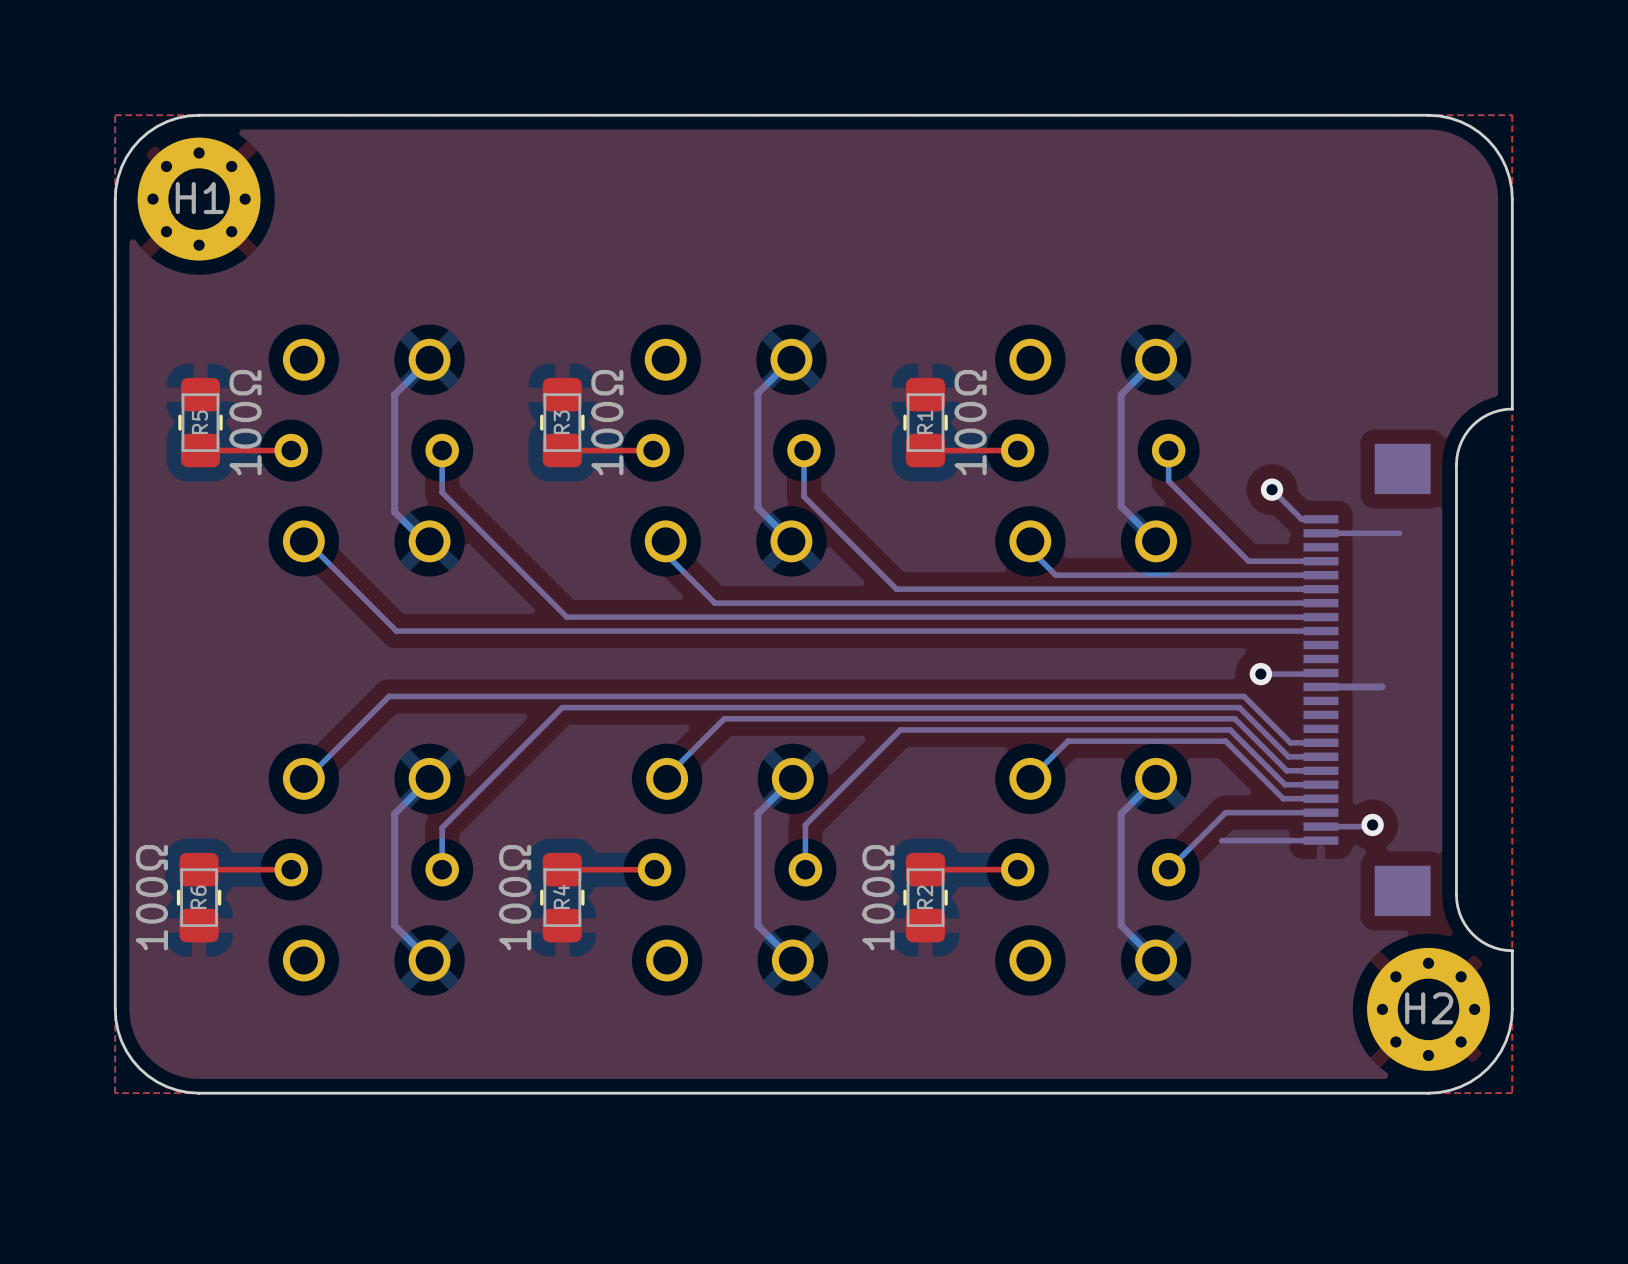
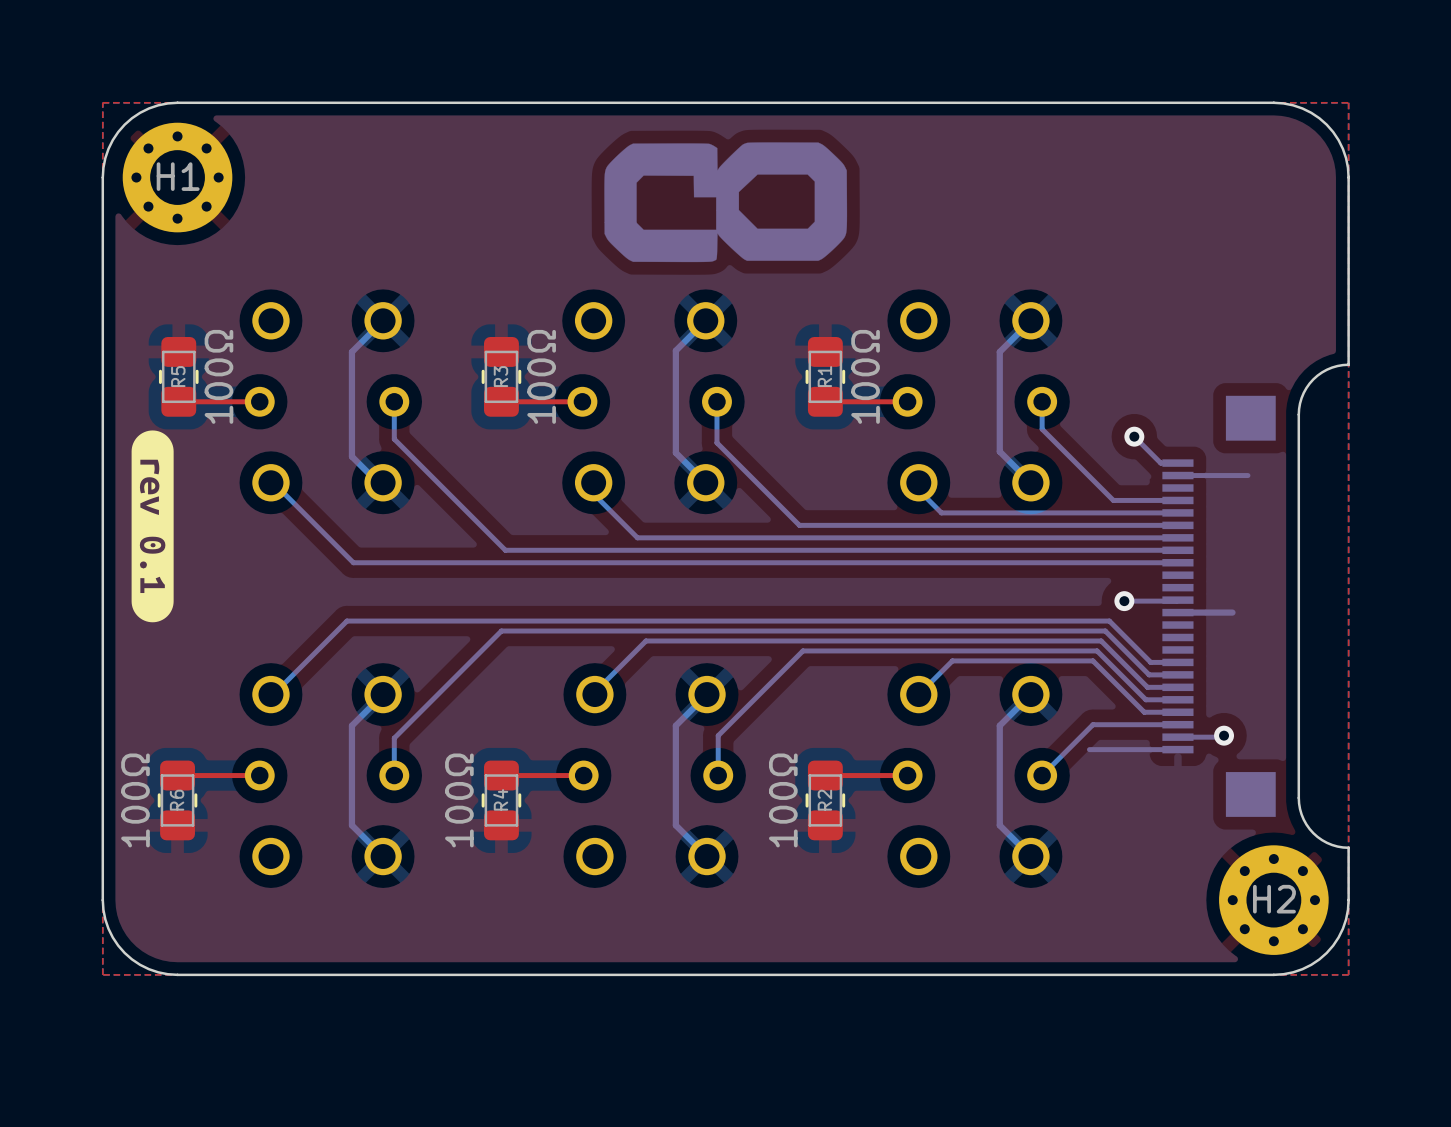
drawing: none -> [604, 142, 848, 263]
drawing: none -> [131, 430, 174, 623]

